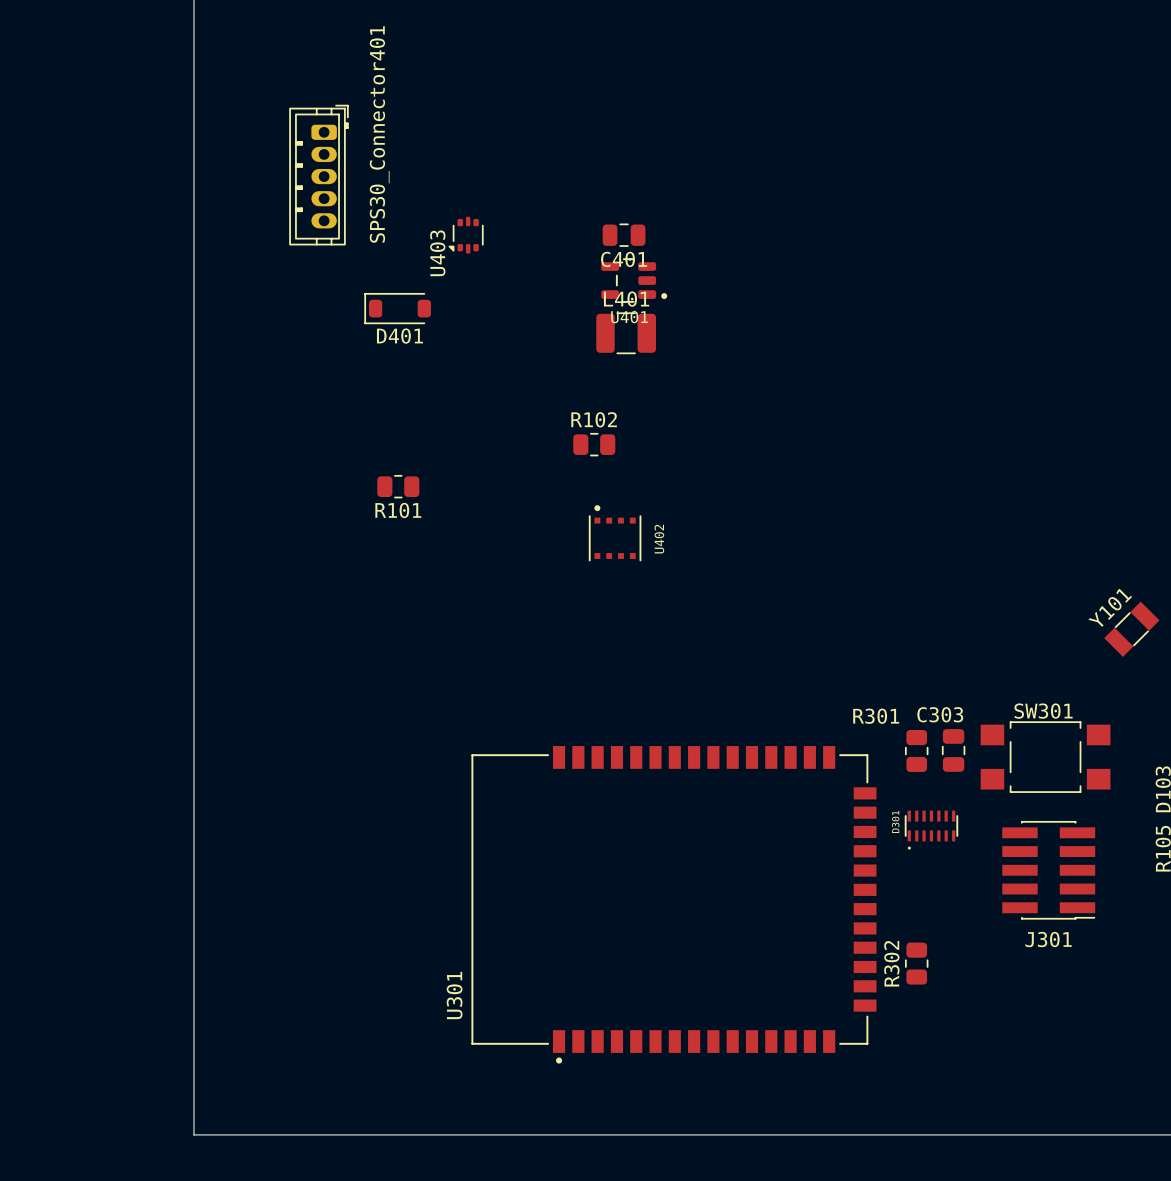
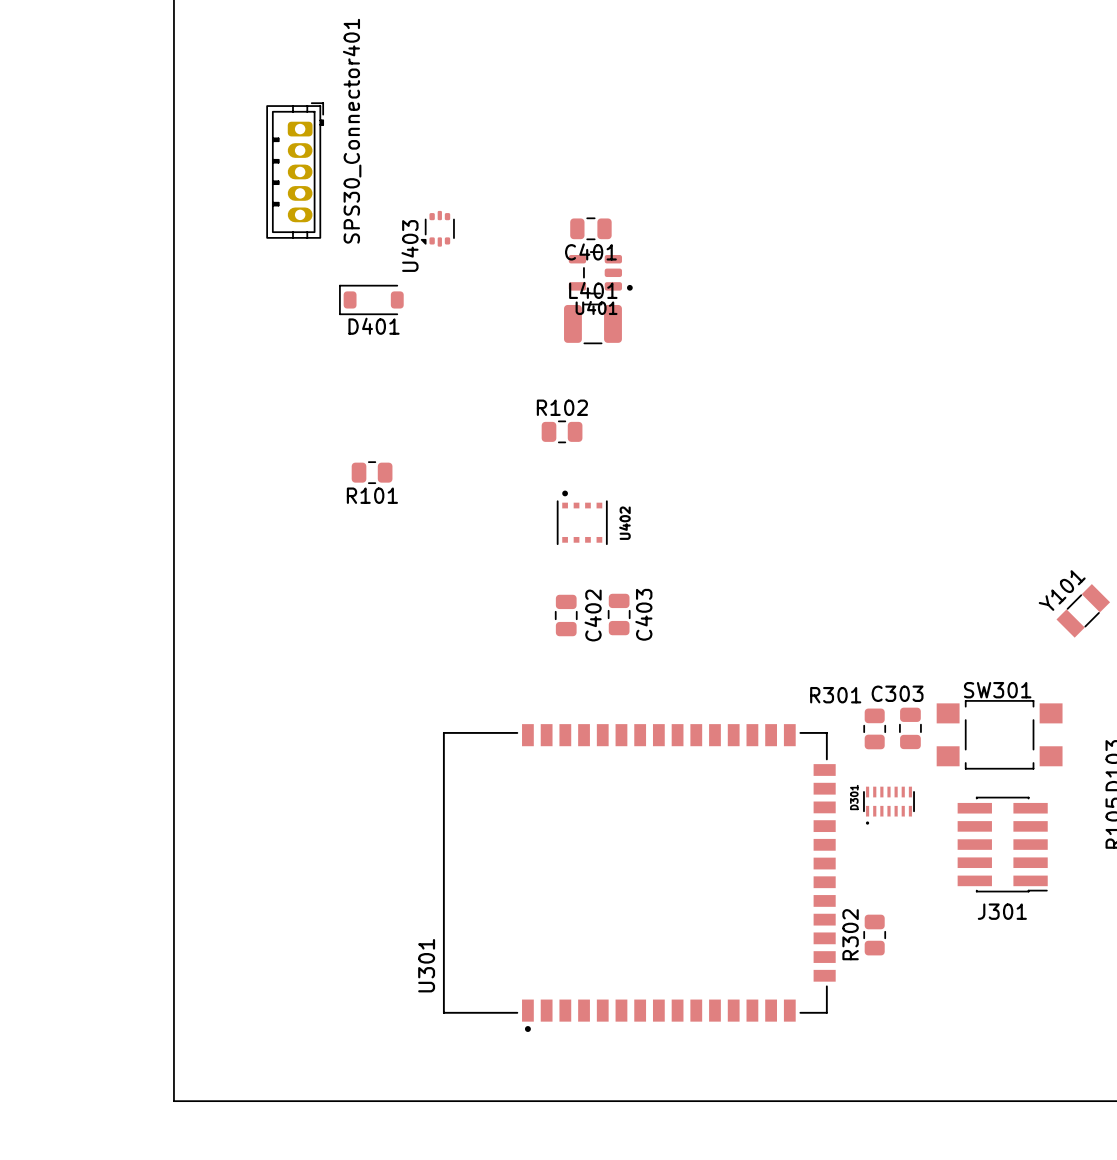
C403: none -> (619, 614)
C402: none -> (566, 615)

